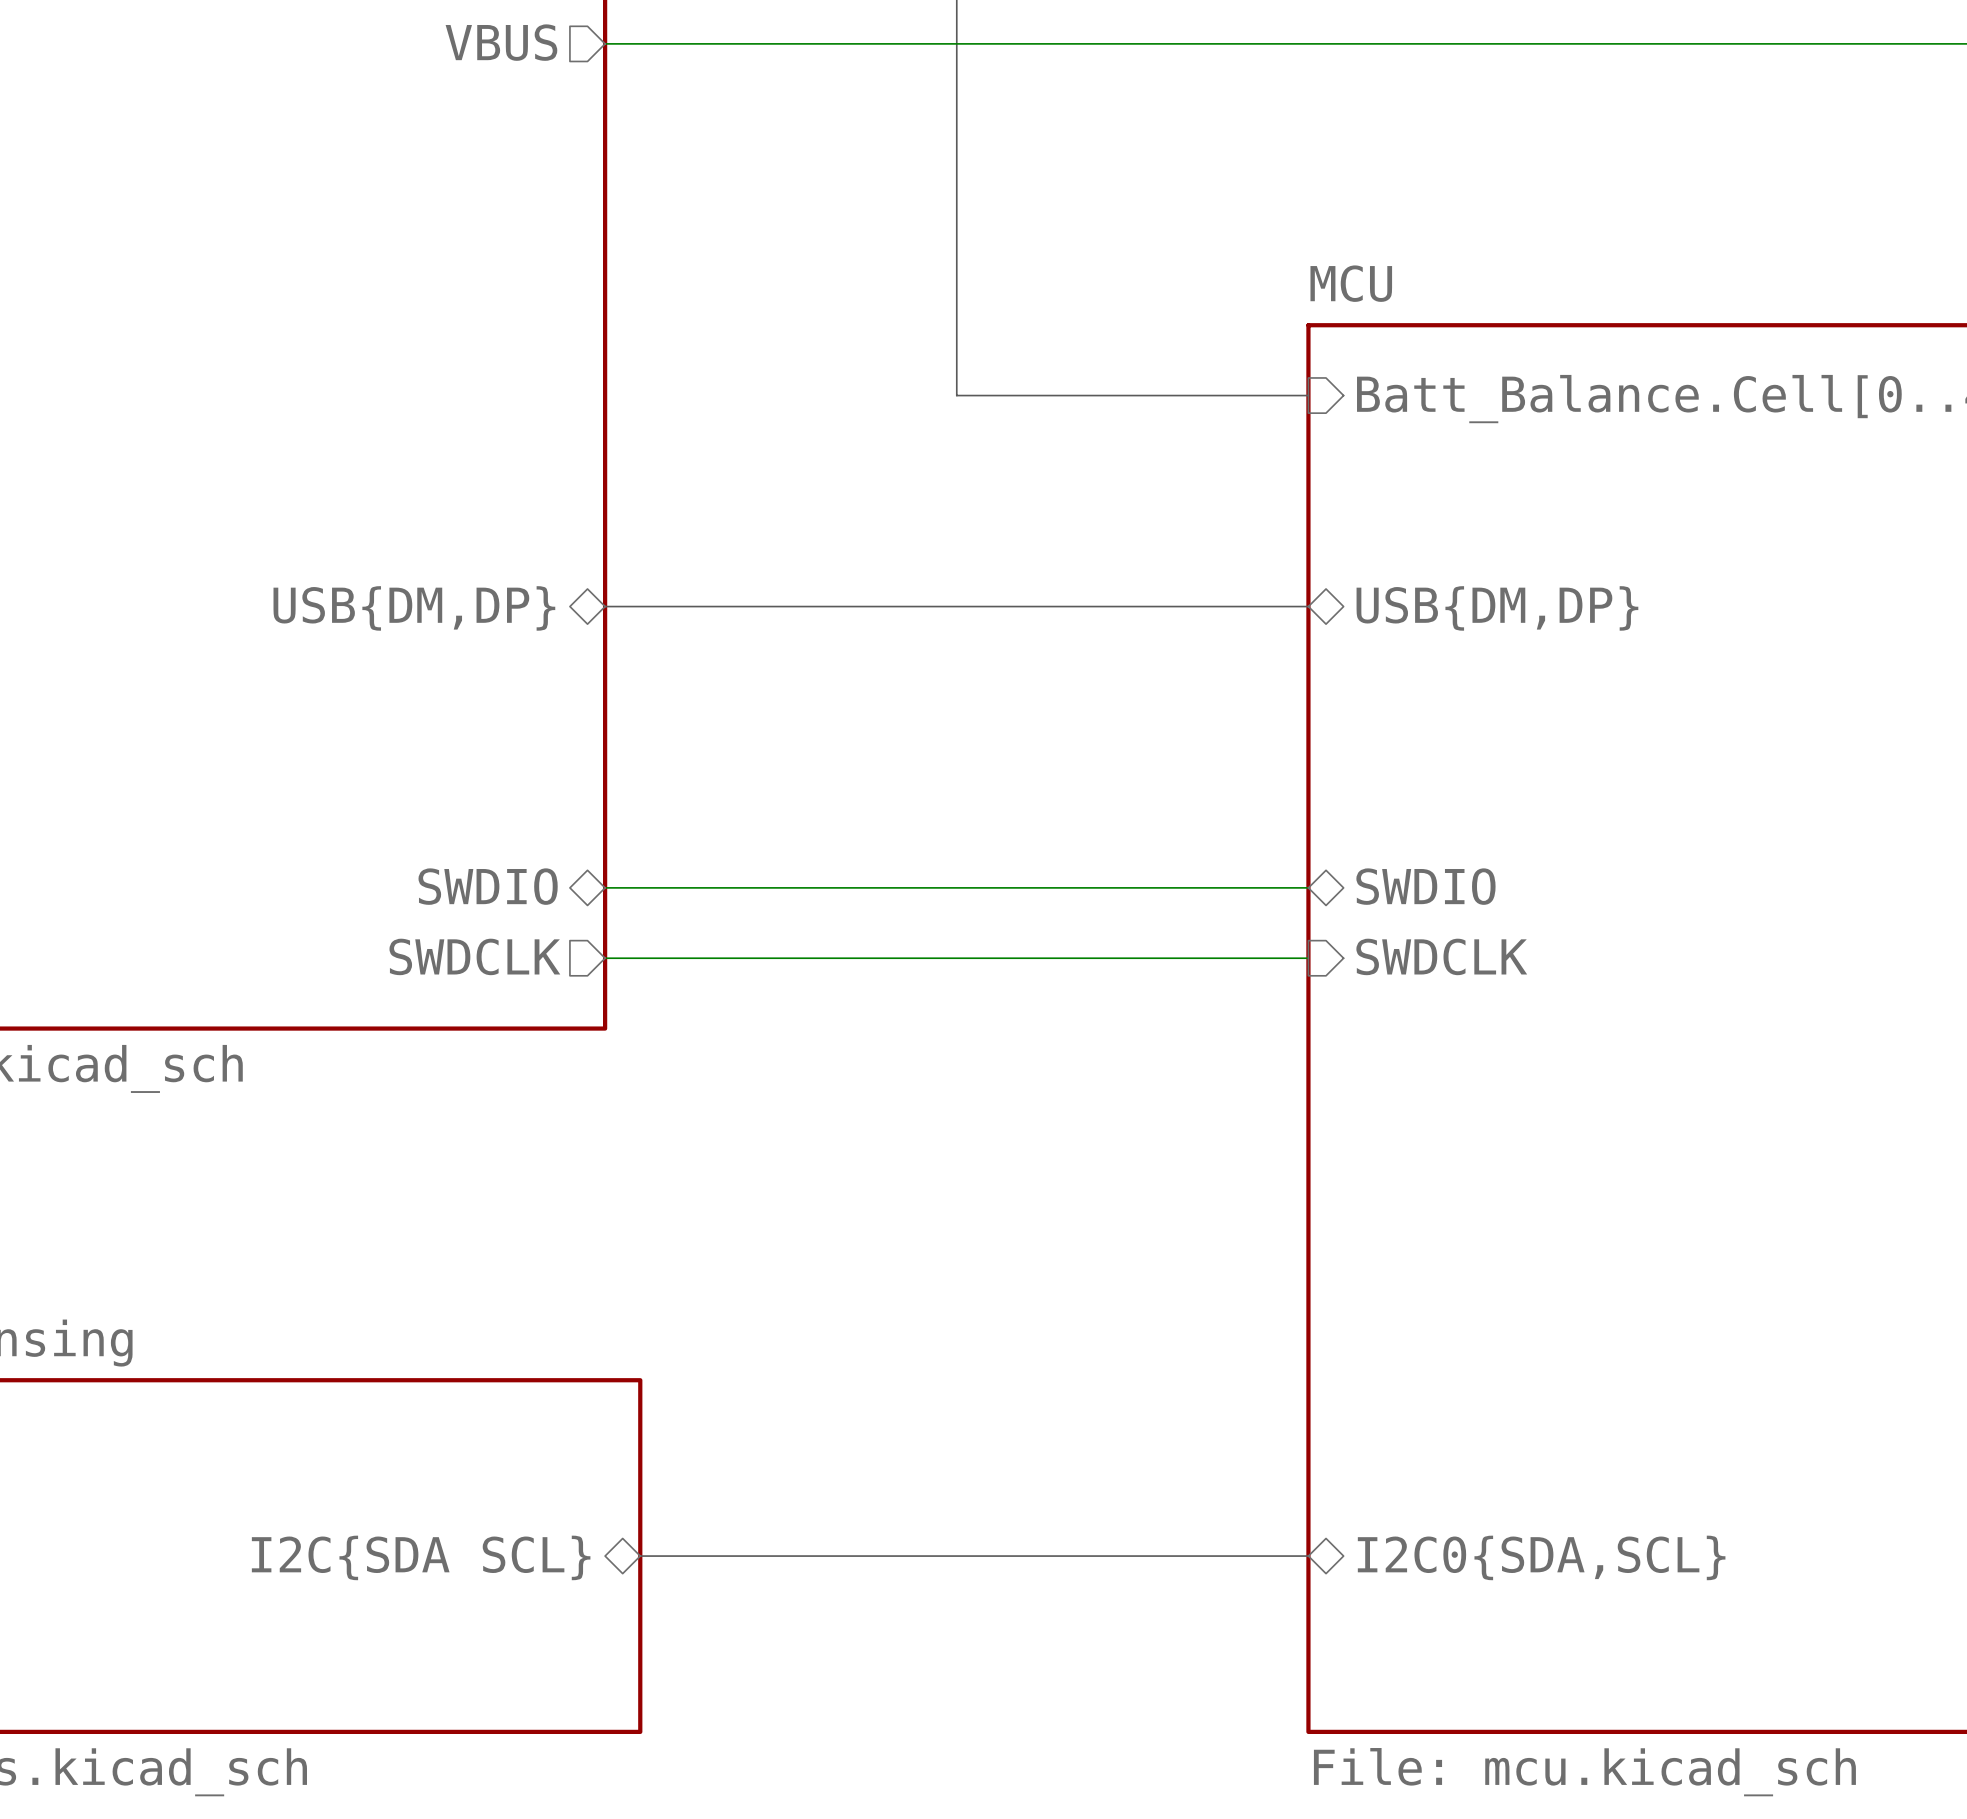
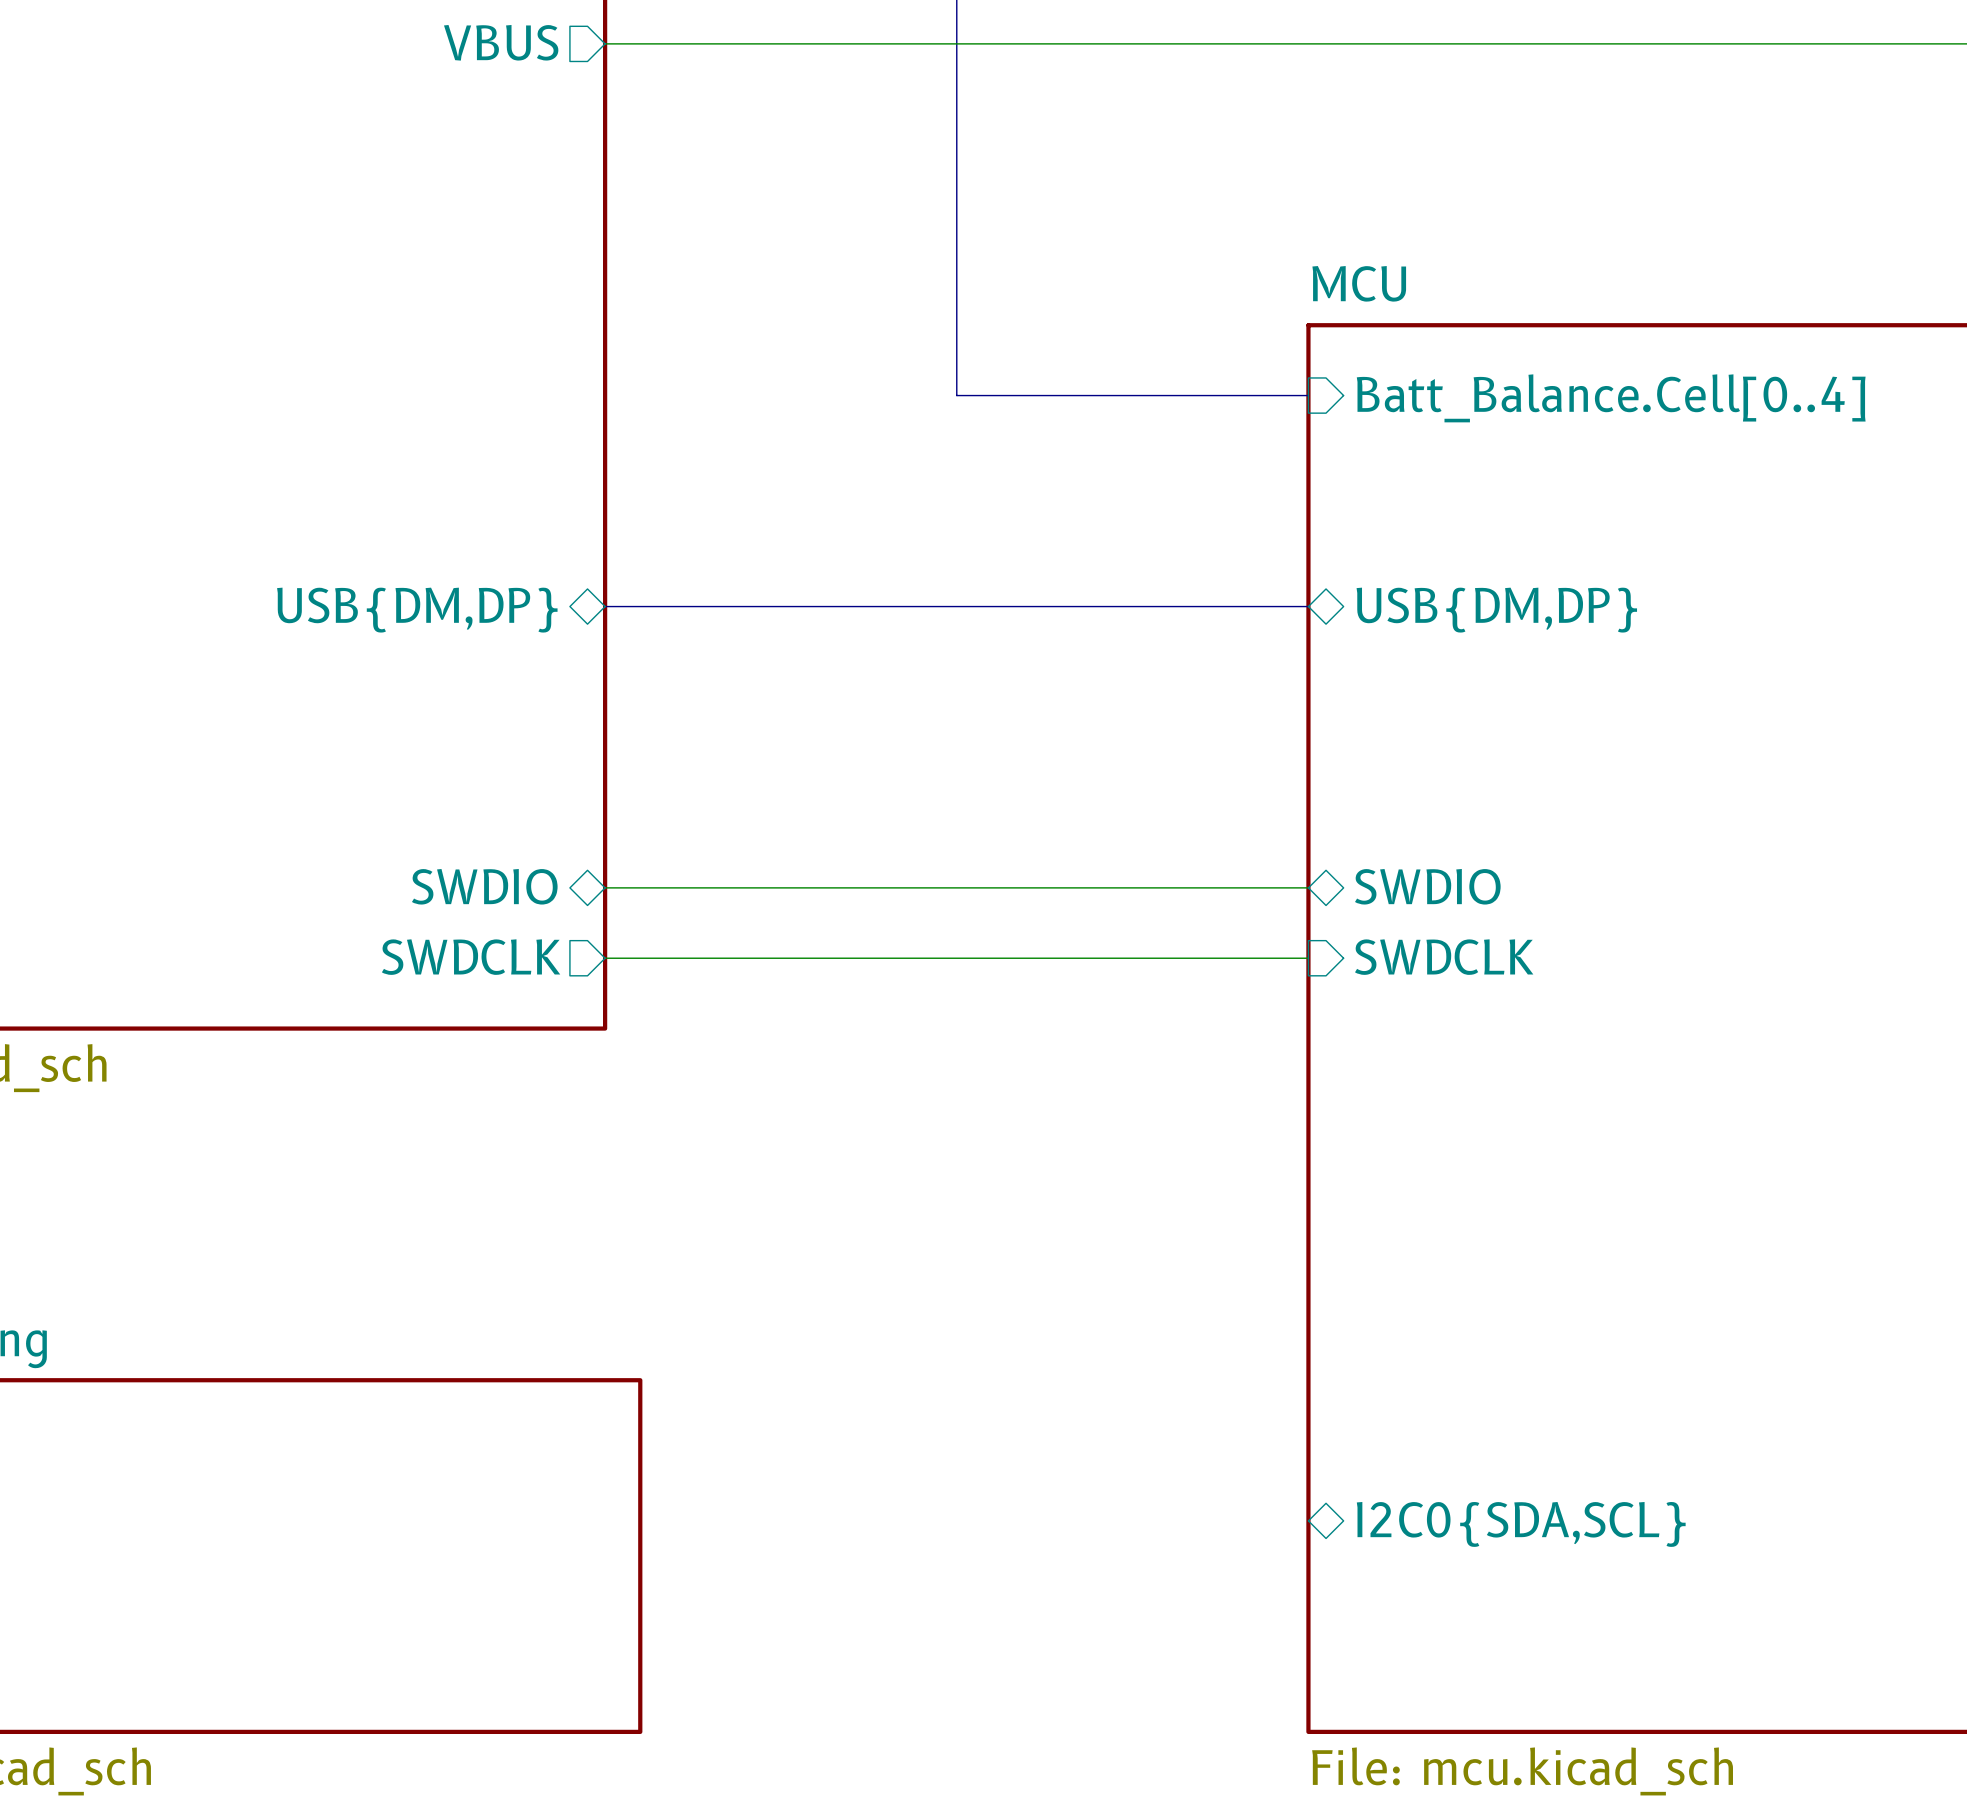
bus: (640, 1556) (1308, 1556) -> none
sheet pin: I2C{SDA SCL} (421, 1557) -> none
sheet pin position: I2C0{SDA,SCL} (1541, 1557) -> I2C0{SDA,SCL} (1521, 1524)

